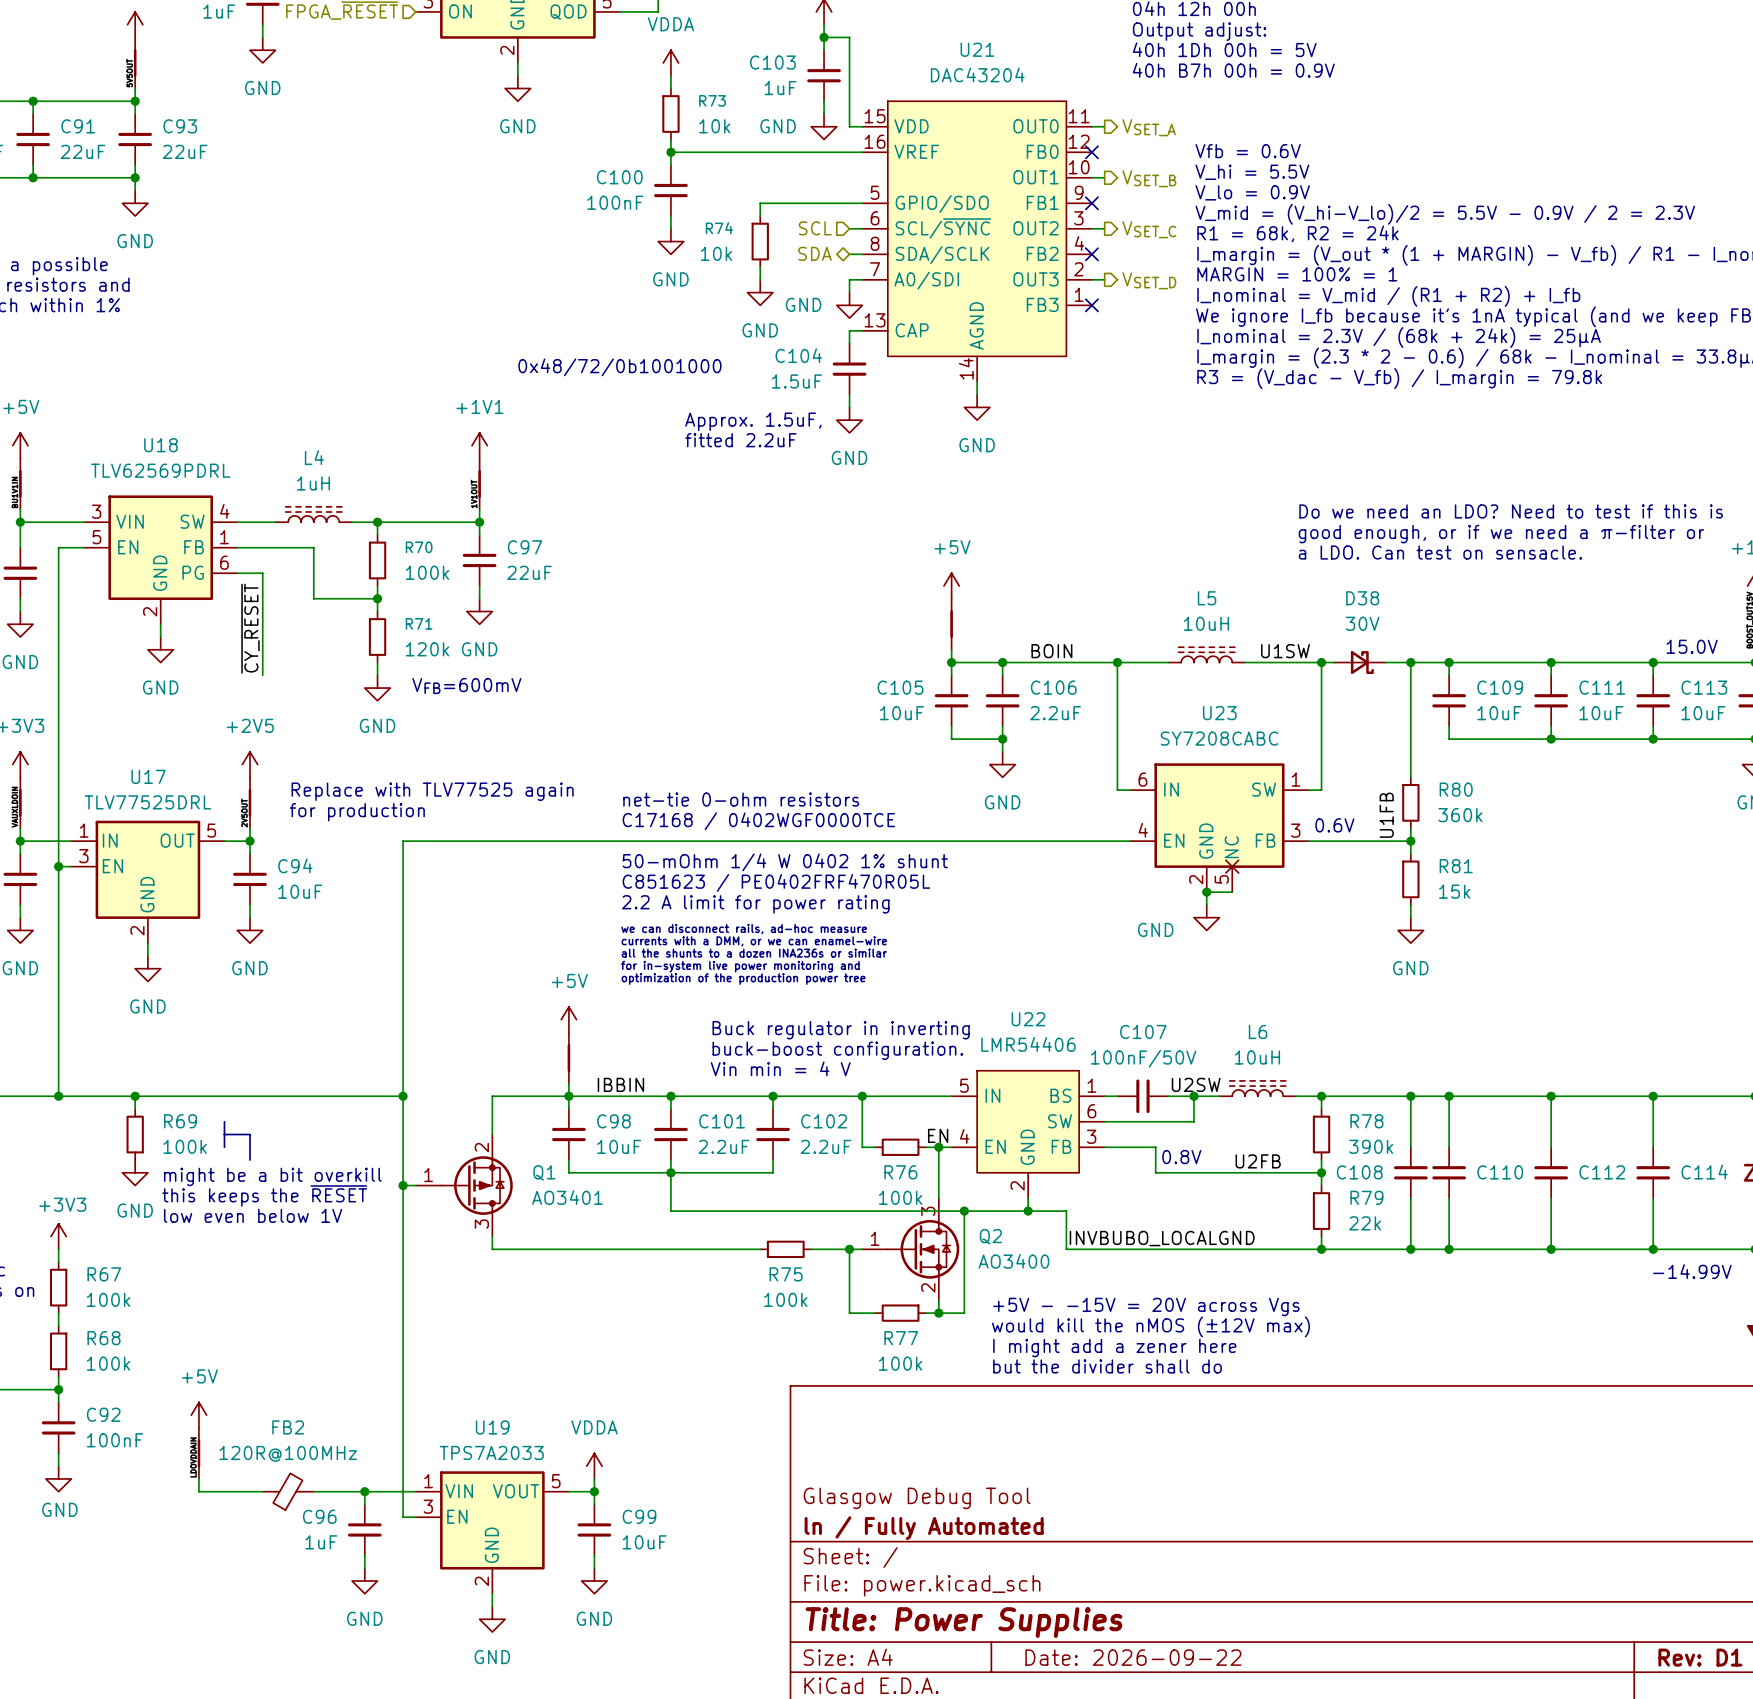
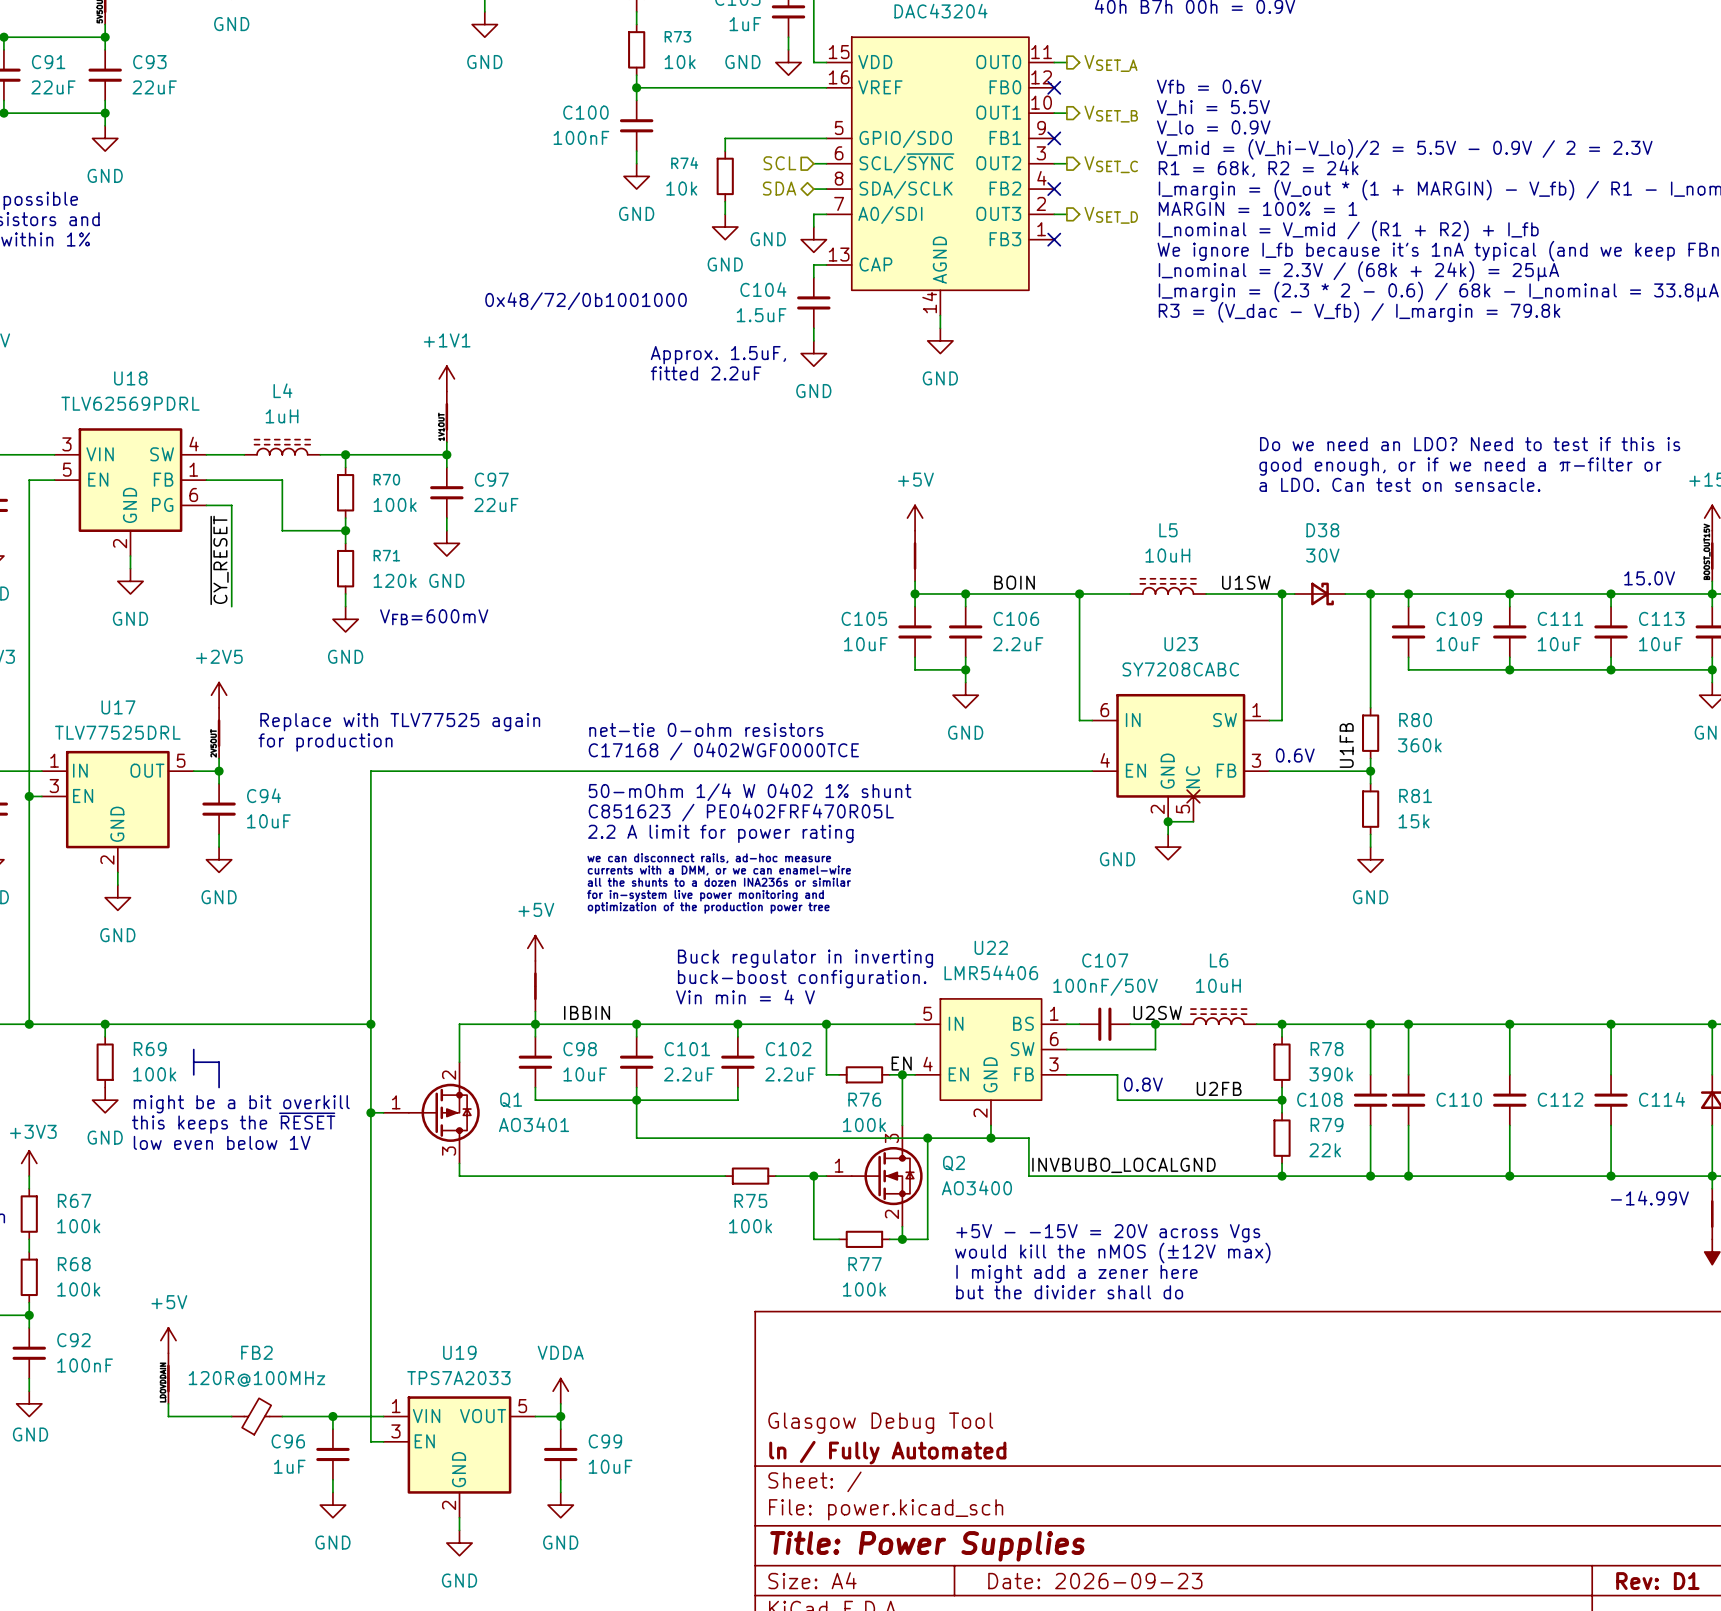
title block: Date: 2026-09-22 (1133, 1657) -> Date: 2026-09-23 (1095, 1581)

